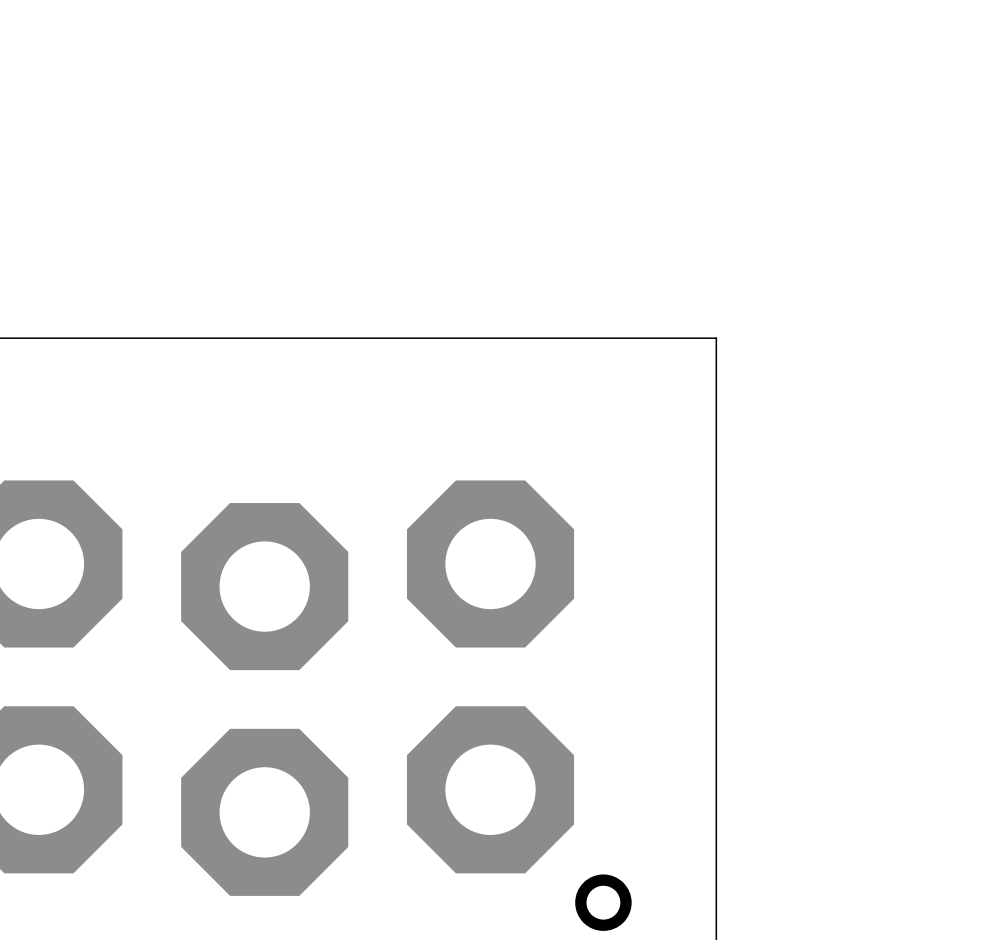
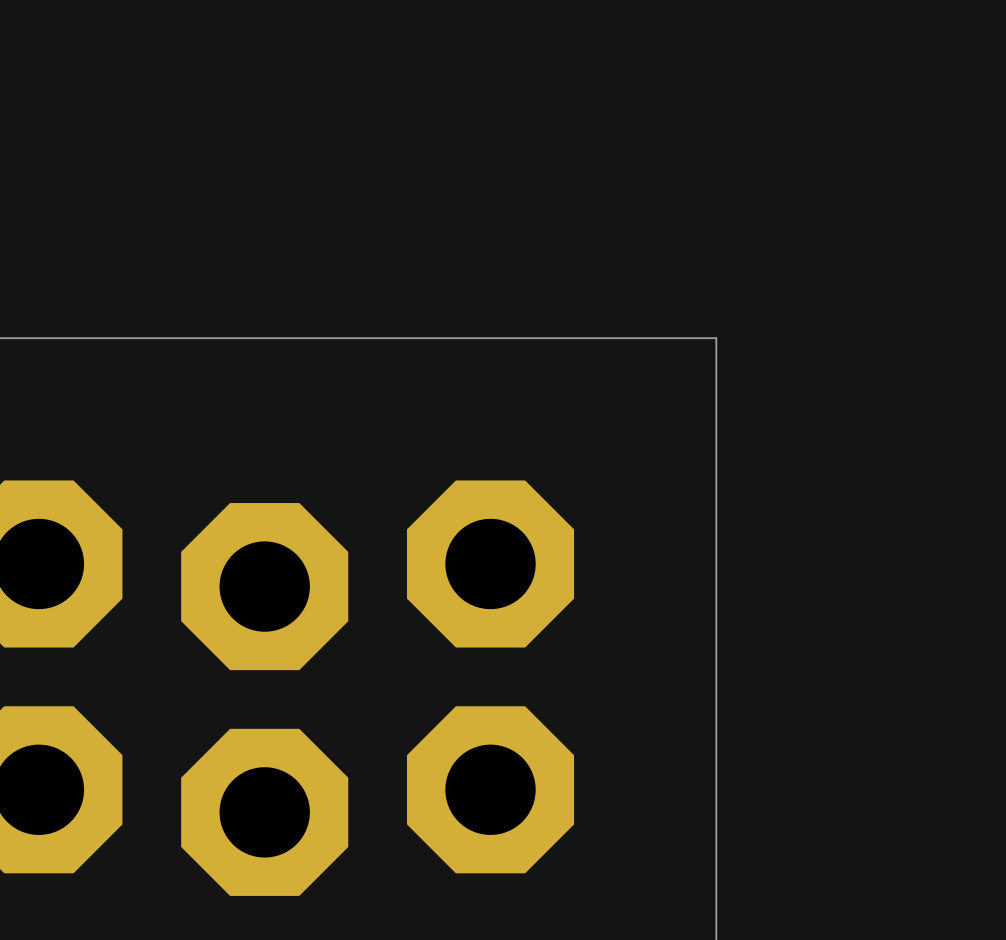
drawing: [575, 874, 632, 931] -> none

